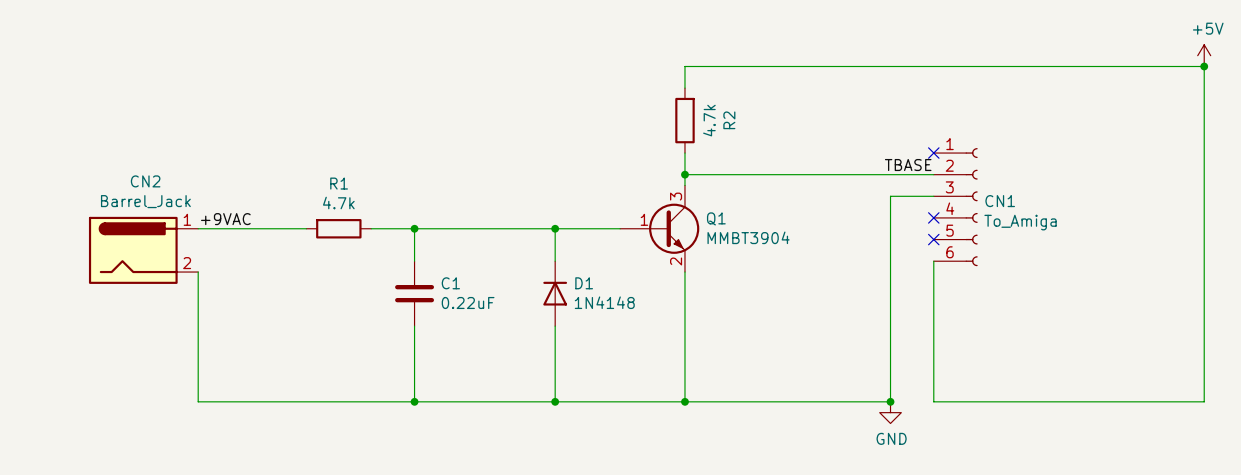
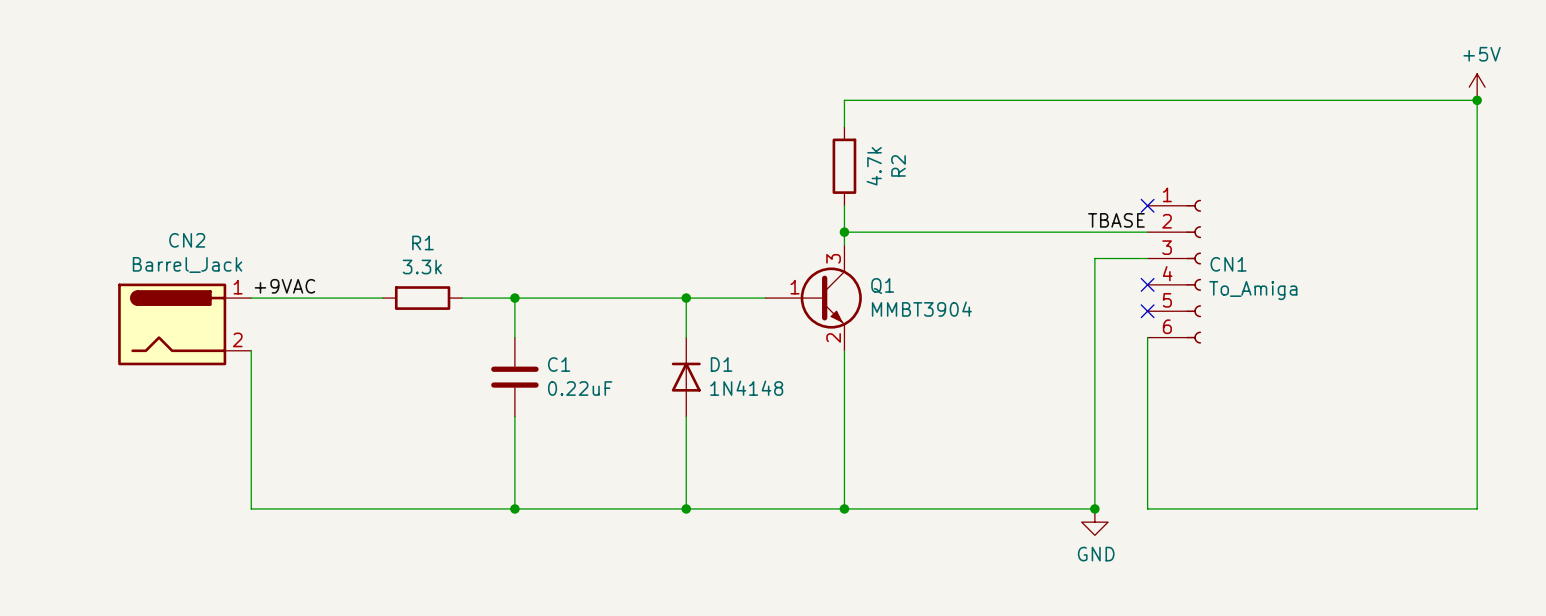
R1 value: 4.7k (338, 203) -> 3.3k (422, 266)

